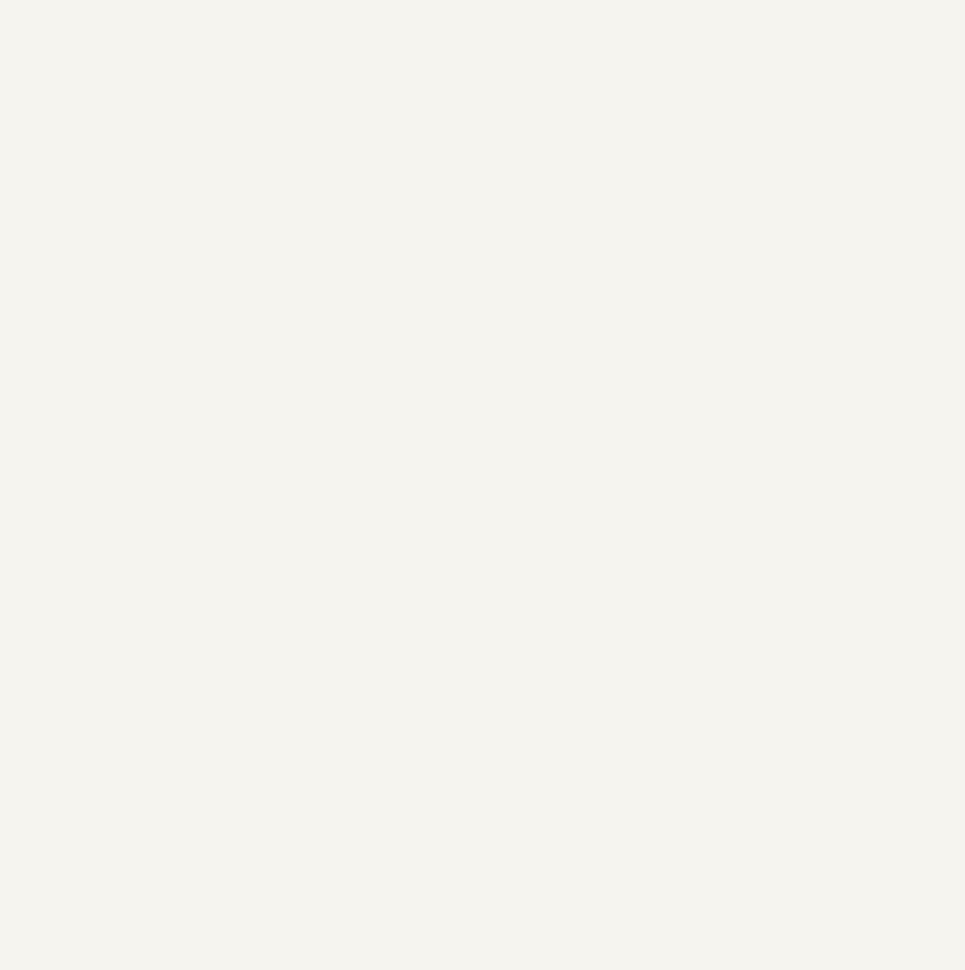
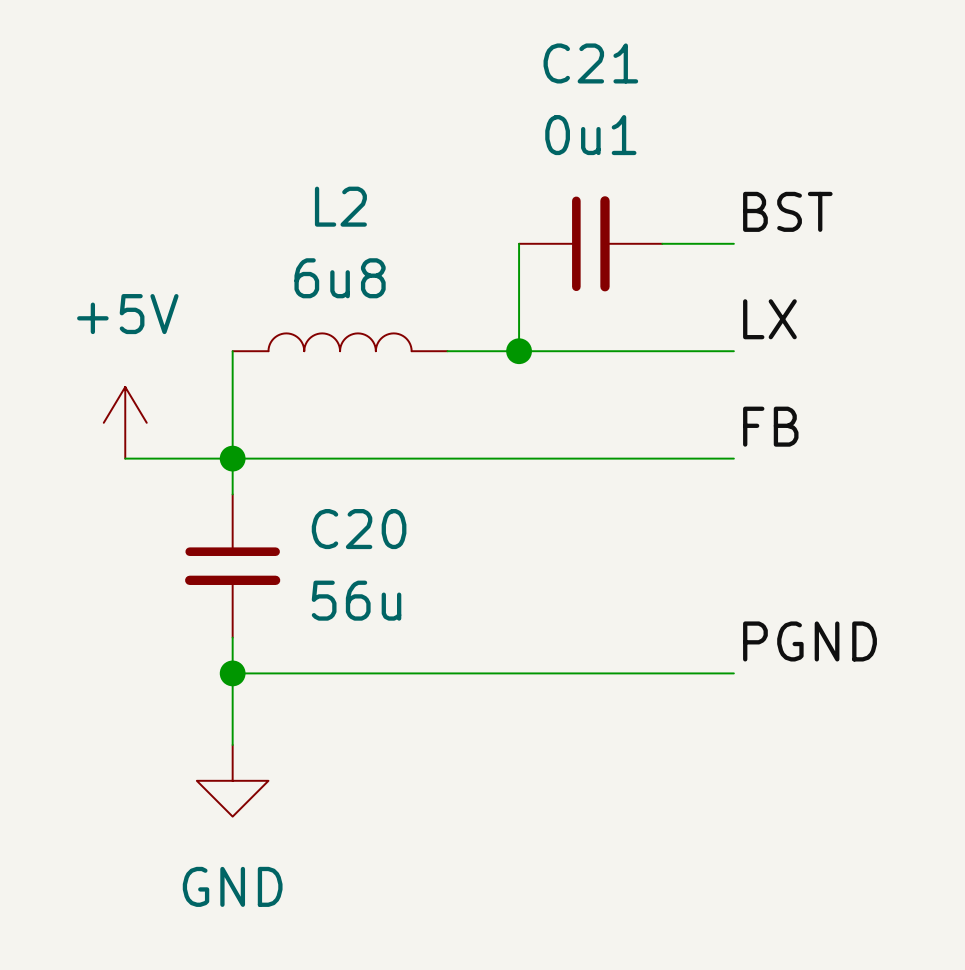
label: none -> BST (787, 211)
wire: none -> (519, 243) (519, 351)
C21: none -> 0u1 (590, 243)
wire: none -> (662, 243) (733, 243)
label: none -> LX (769, 319)
L2: none -> 6u8 (340, 342)
wire: none -> (232, 351) (232, 494)
wire: none -> (447, 351) (733, 351)
junction: none -> (519, 351)
power symbol: none -> +5V (125, 422)
label: none -> FB (770, 426)
wire: none -> (125, 458) (733, 458)
junction: none -> (232, 458)
C20: none -> 56u (232, 566)
wire: none -> (232, 637) (232, 745)
label: none -> PGND (810, 641)
wire: none -> (232, 673) (733, 673)
junction: none -> (232, 673)
power symbol: none -> GND (232, 780)

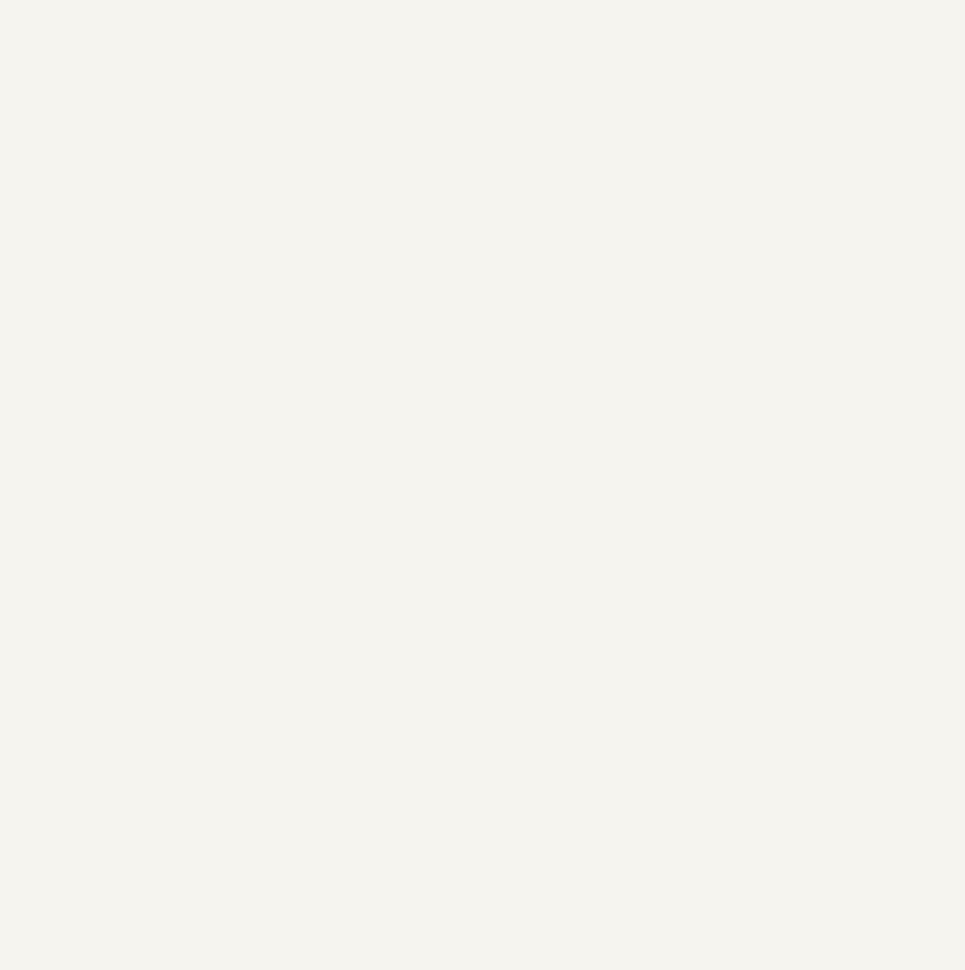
label: BST (787, 211) -> none
wire: (519, 243) (519, 351) -> none
C21: 0u1 (590, 243) -> none
wire: (662, 243) (733, 243) -> none
label: LX (769, 319) -> none
L2: 6u8 (340, 342) -> none
wire: (232, 351) (232, 494) -> none
wire: (447, 351) (733, 351) -> none
junction: (519, 351) -> none
power symbol: +5V (125, 422) -> none
label: FB (770, 426) -> none
wire: (125, 458) (733, 458) -> none
junction: (232, 458) -> none
C20: 56u (232, 566) -> none
wire: (232, 637) (232, 745) -> none
label: PGND (810, 641) -> none
wire: (232, 673) (733, 673) -> none
junction: (232, 673) -> none
power symbol: GND (232, 780) -> none

